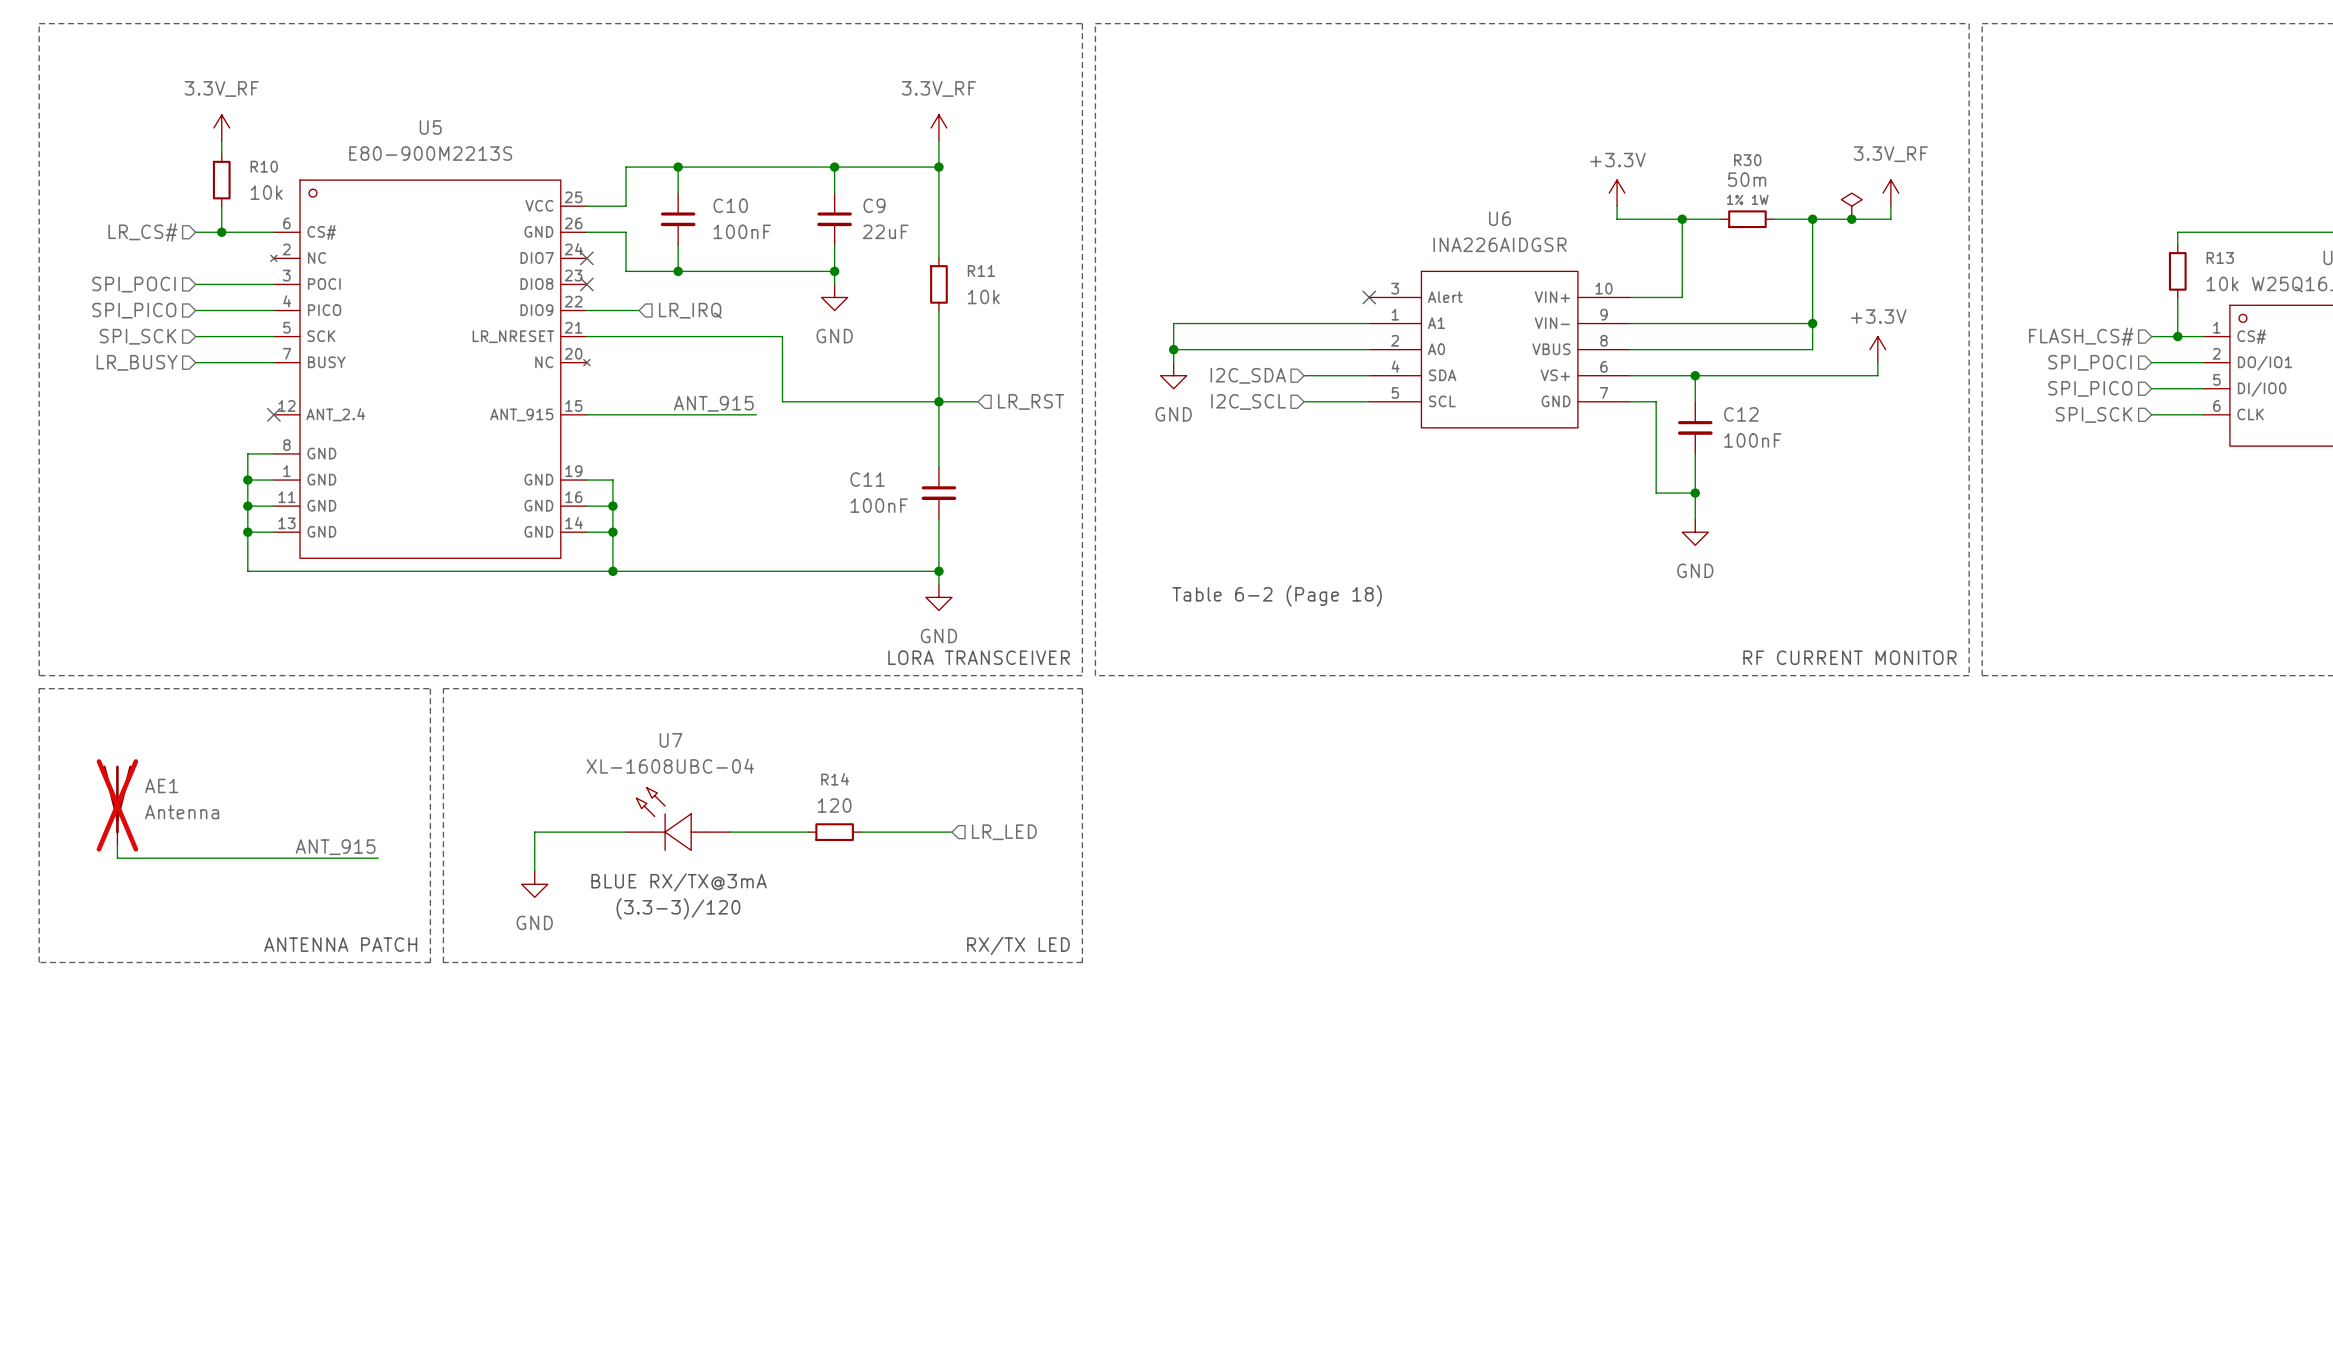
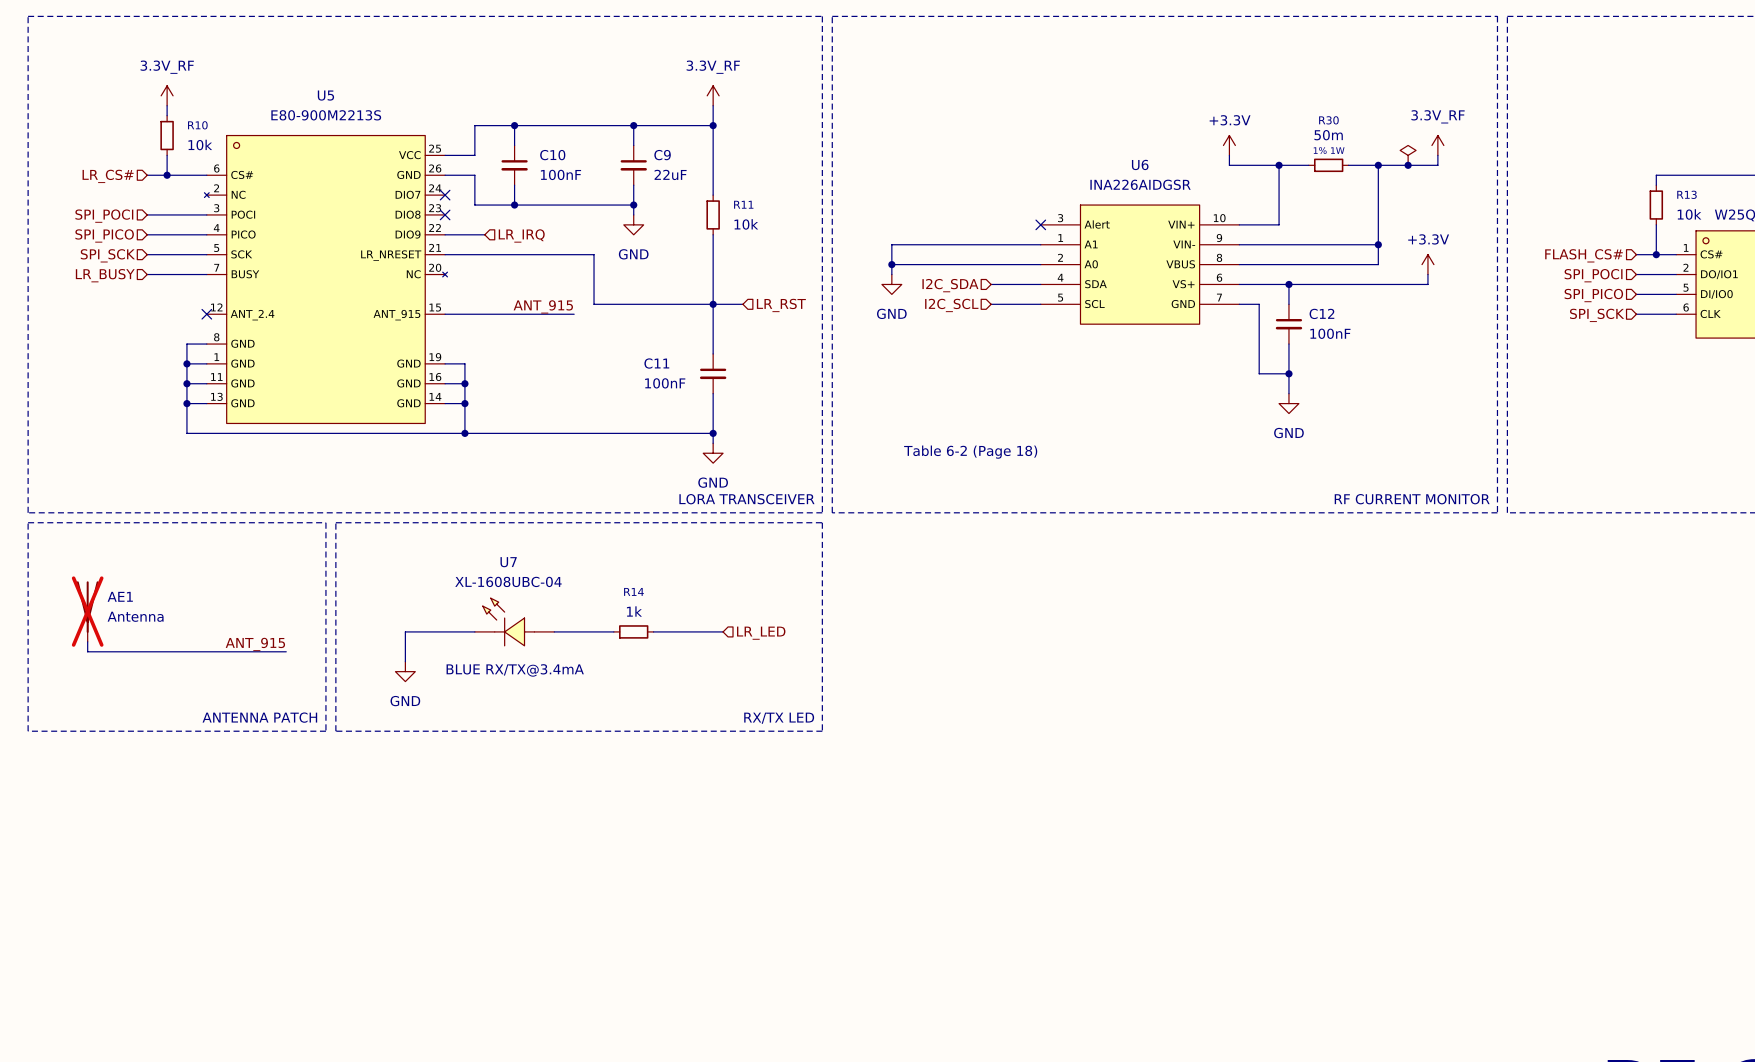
R14 value: 120 (834, 805) -> 1k (634, 611)
text: BLUE RX/TX@3mA (679, 882) -> BLUE RX/TX@3.4mA (515, 670)
text: (3.3-3)/120 (678, 908) -> none

